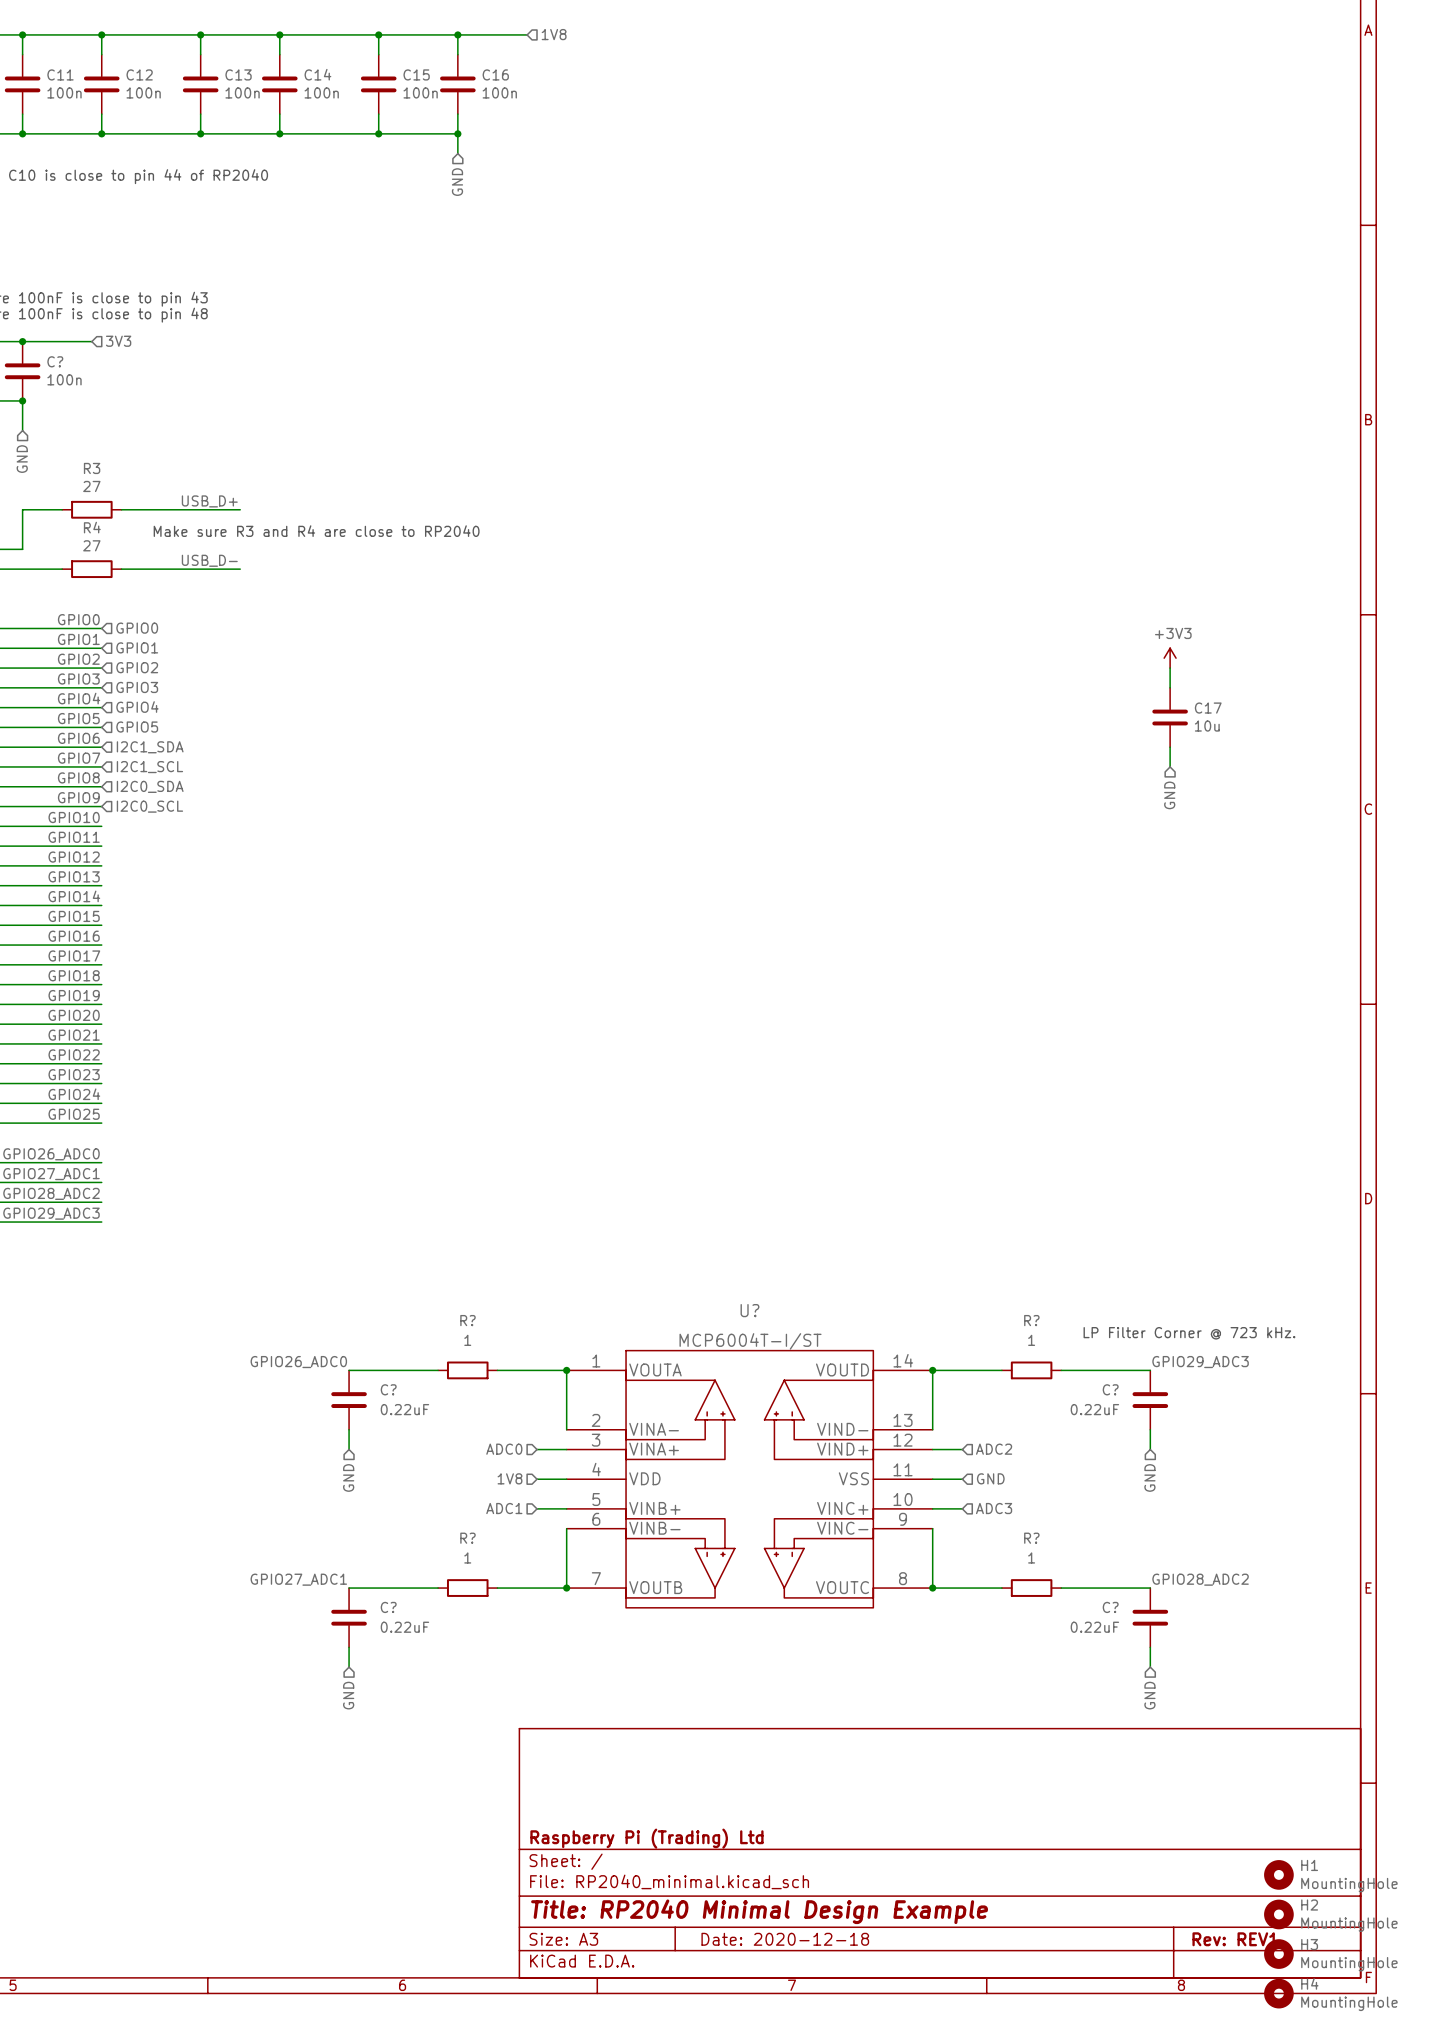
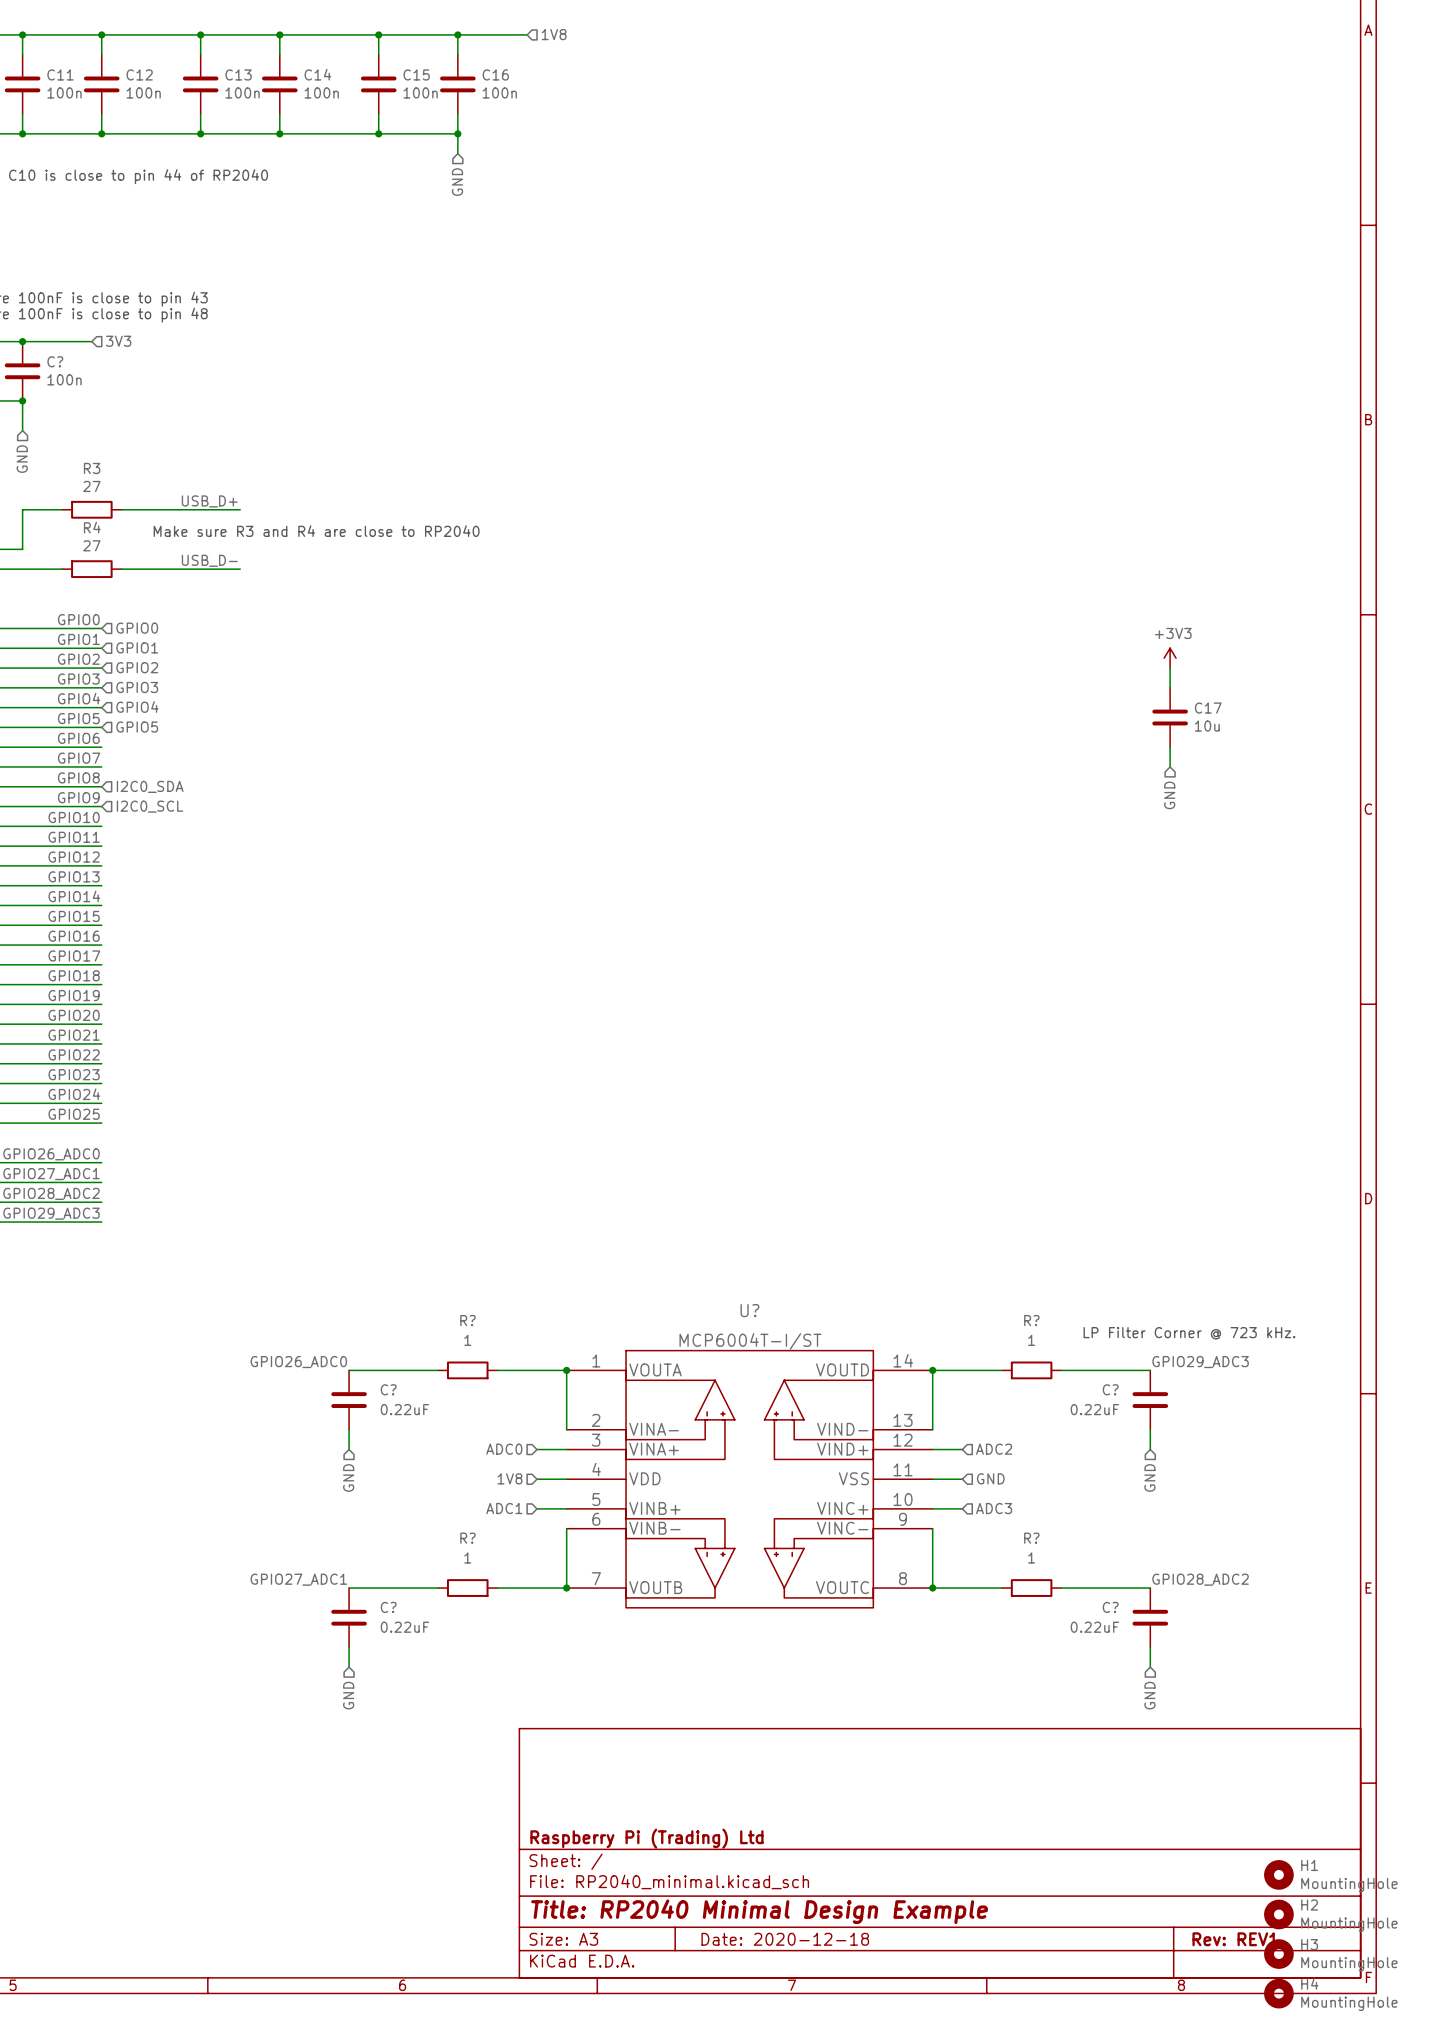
hierarchical label: I2C1_SDA (150, 747) -> none
hierarchical label: I2C1_SCL (149, 767) -> none

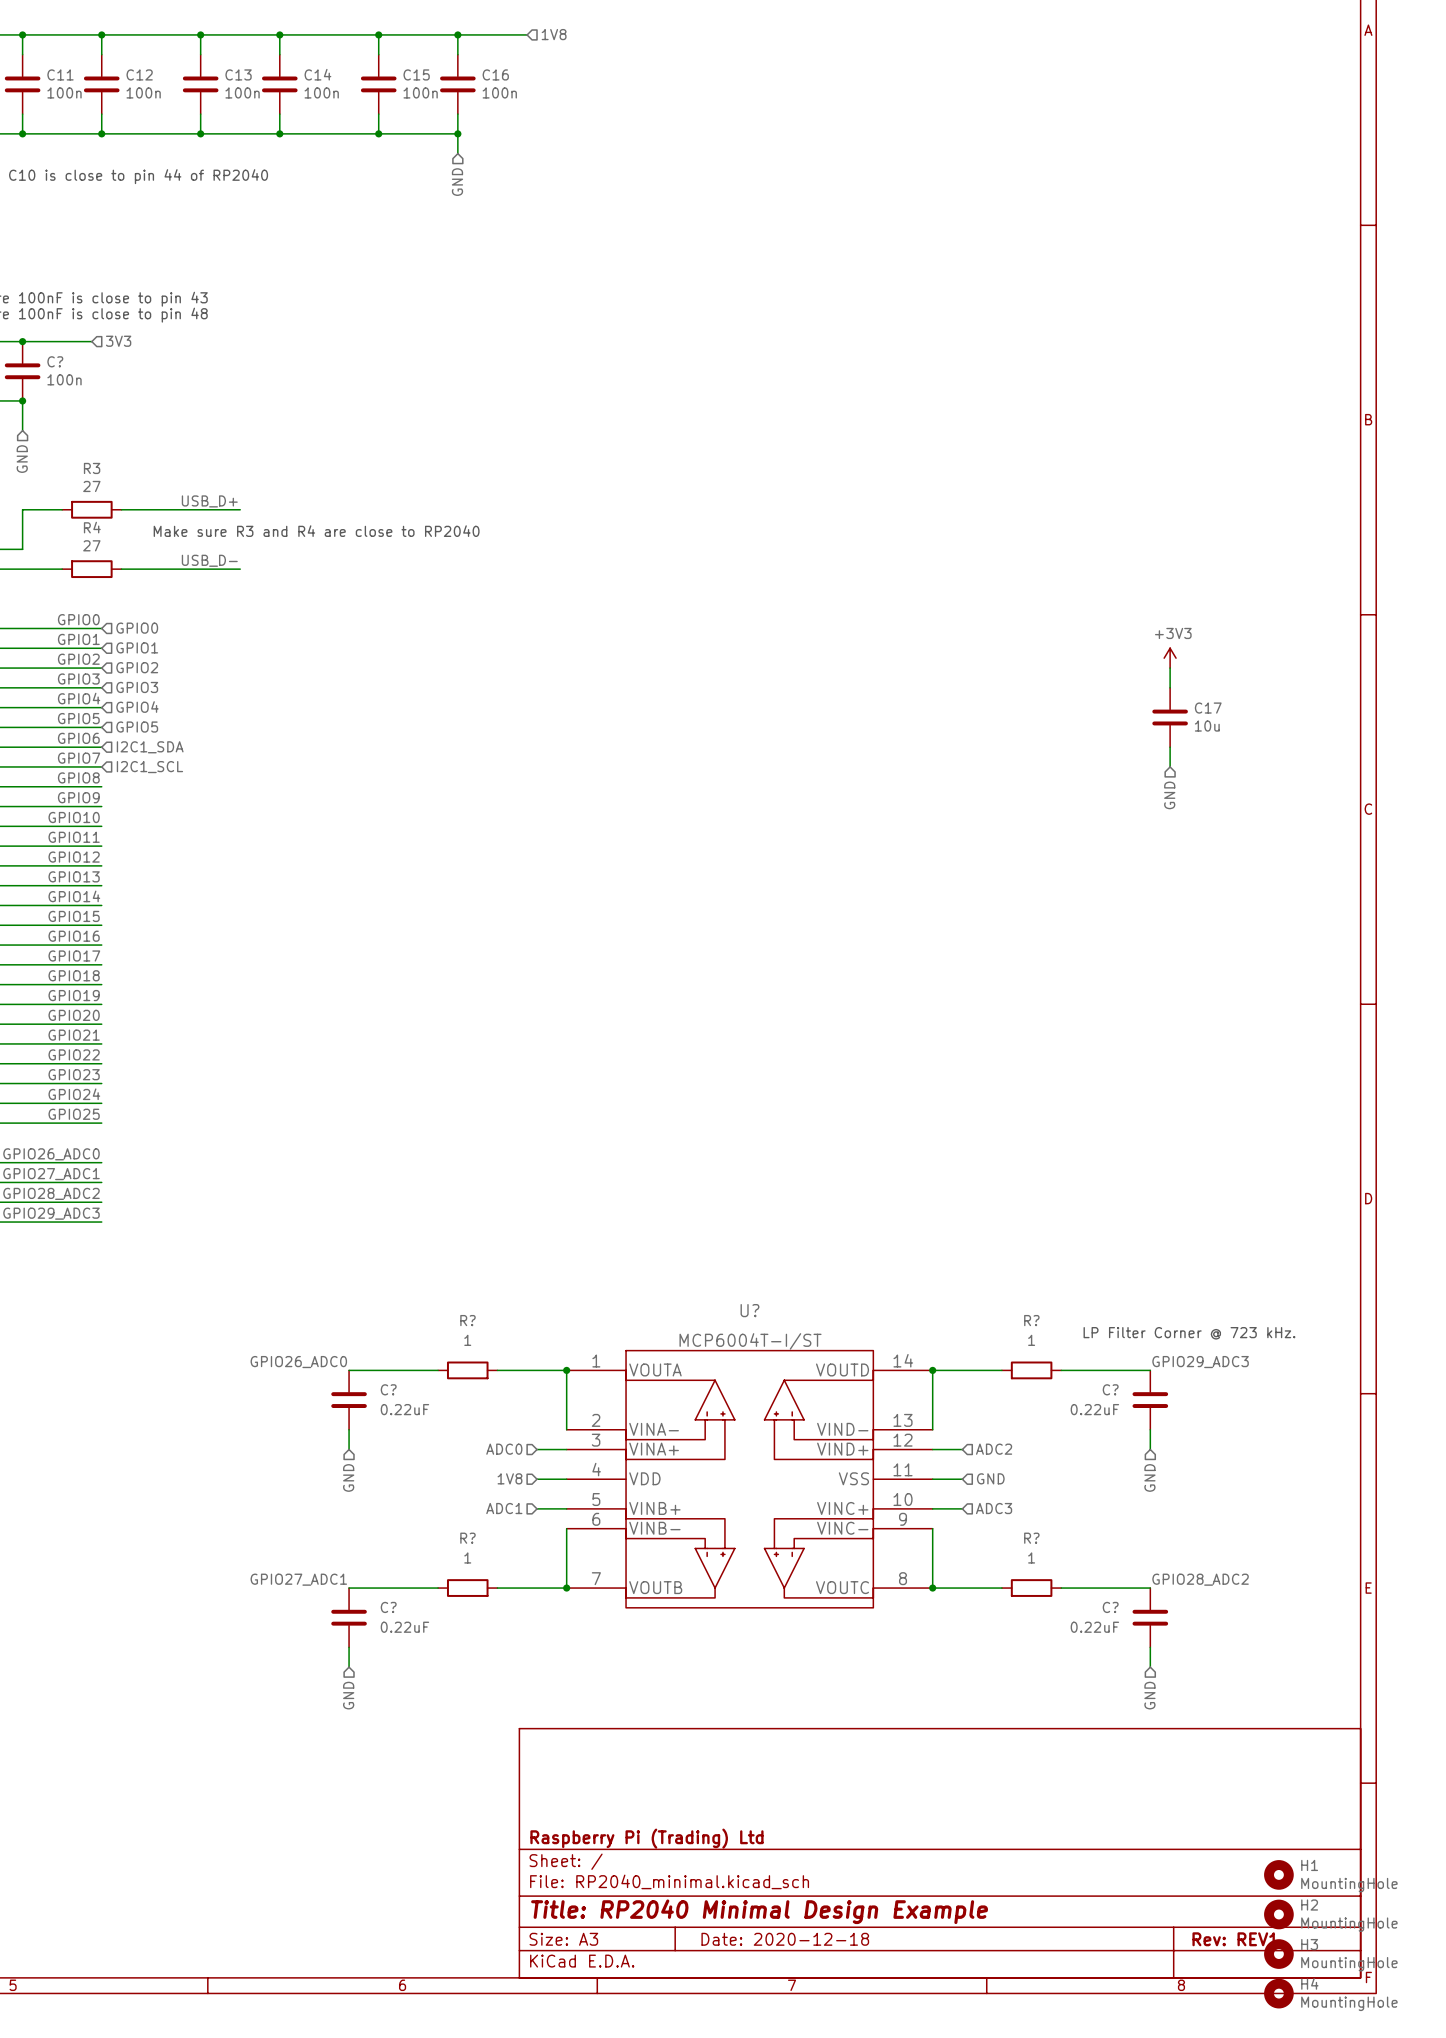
hierarchical label: none -> I2C1_SDA (150, 747)
hierarchical label: I2C0_SDA (150, 786) -> I2C1_SCL (149, 767)
hierarchical label: I2C0_SCL (149, 806) -> none

